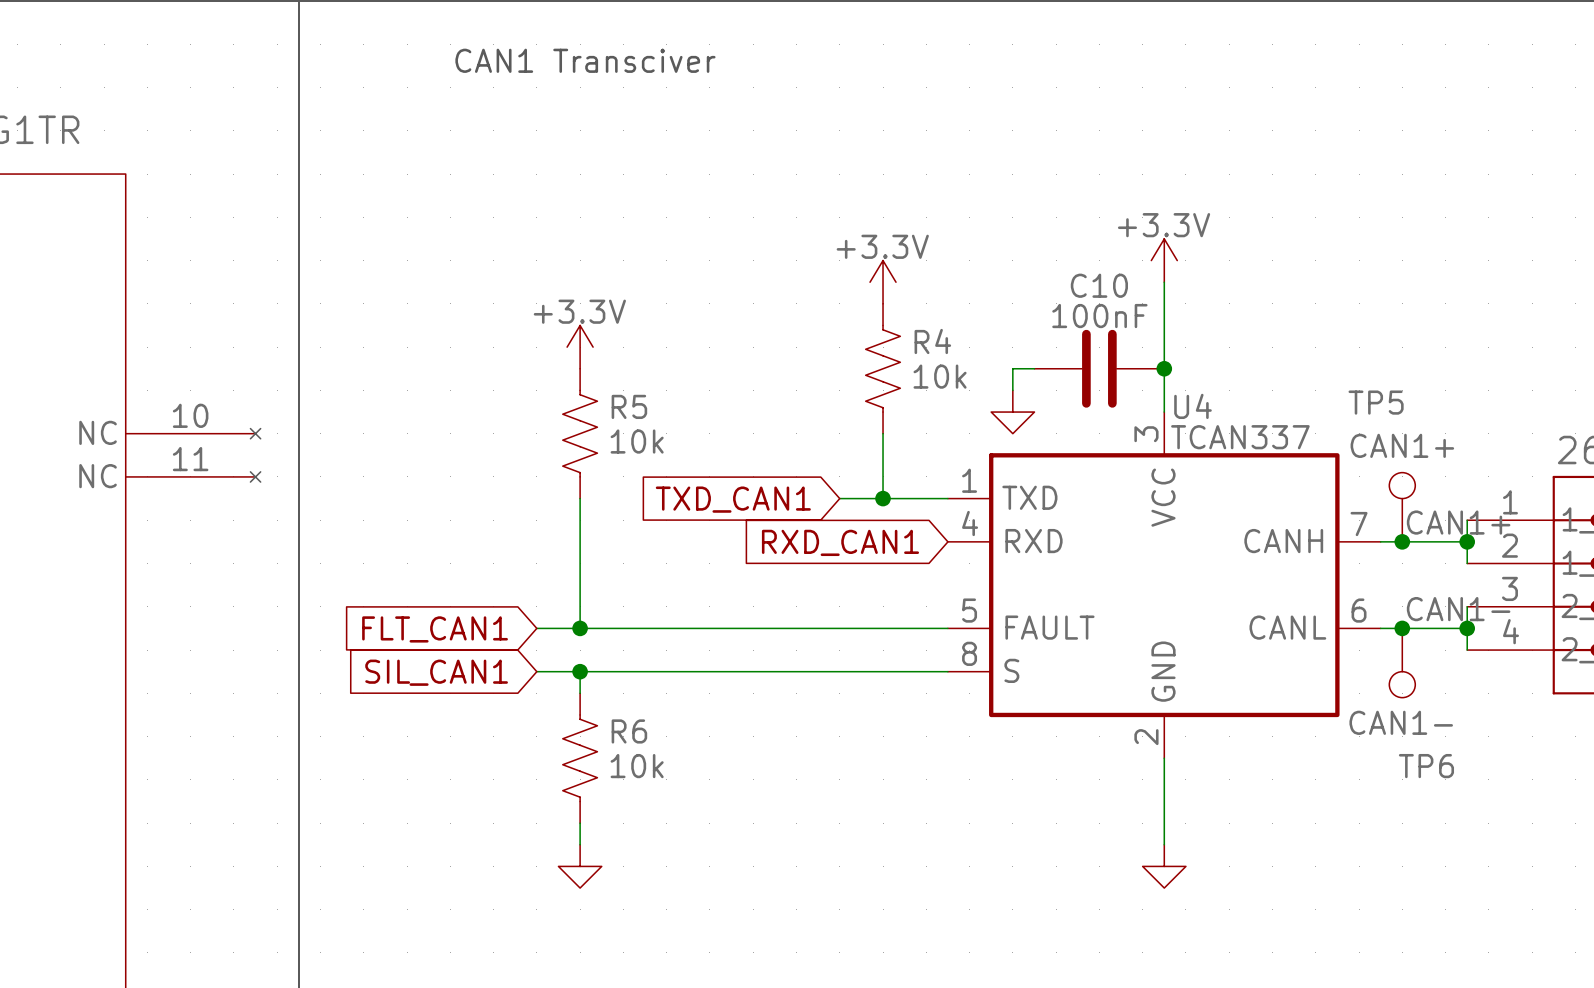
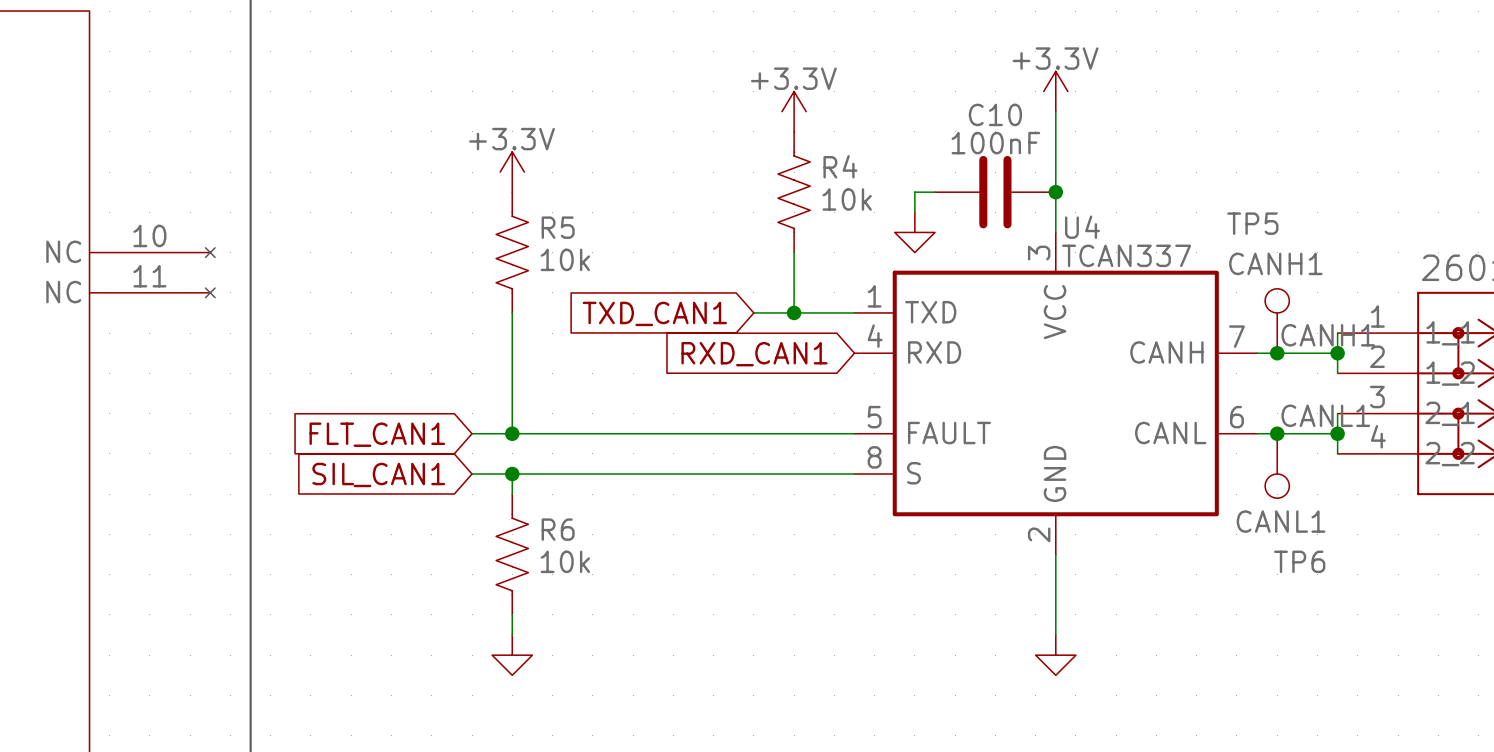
TP5 value: CAN1+ (1402, 445) -> CANH1 (1275, 263)
label: CAN1+ (1458, 522) -> CANH1 (1328, 335)
label: CAN1- (1458, 609) -> CANL1 (1325, 415)
TP6 value: CAN1- (1401, 722) -> CANL1 (1281, 521)

